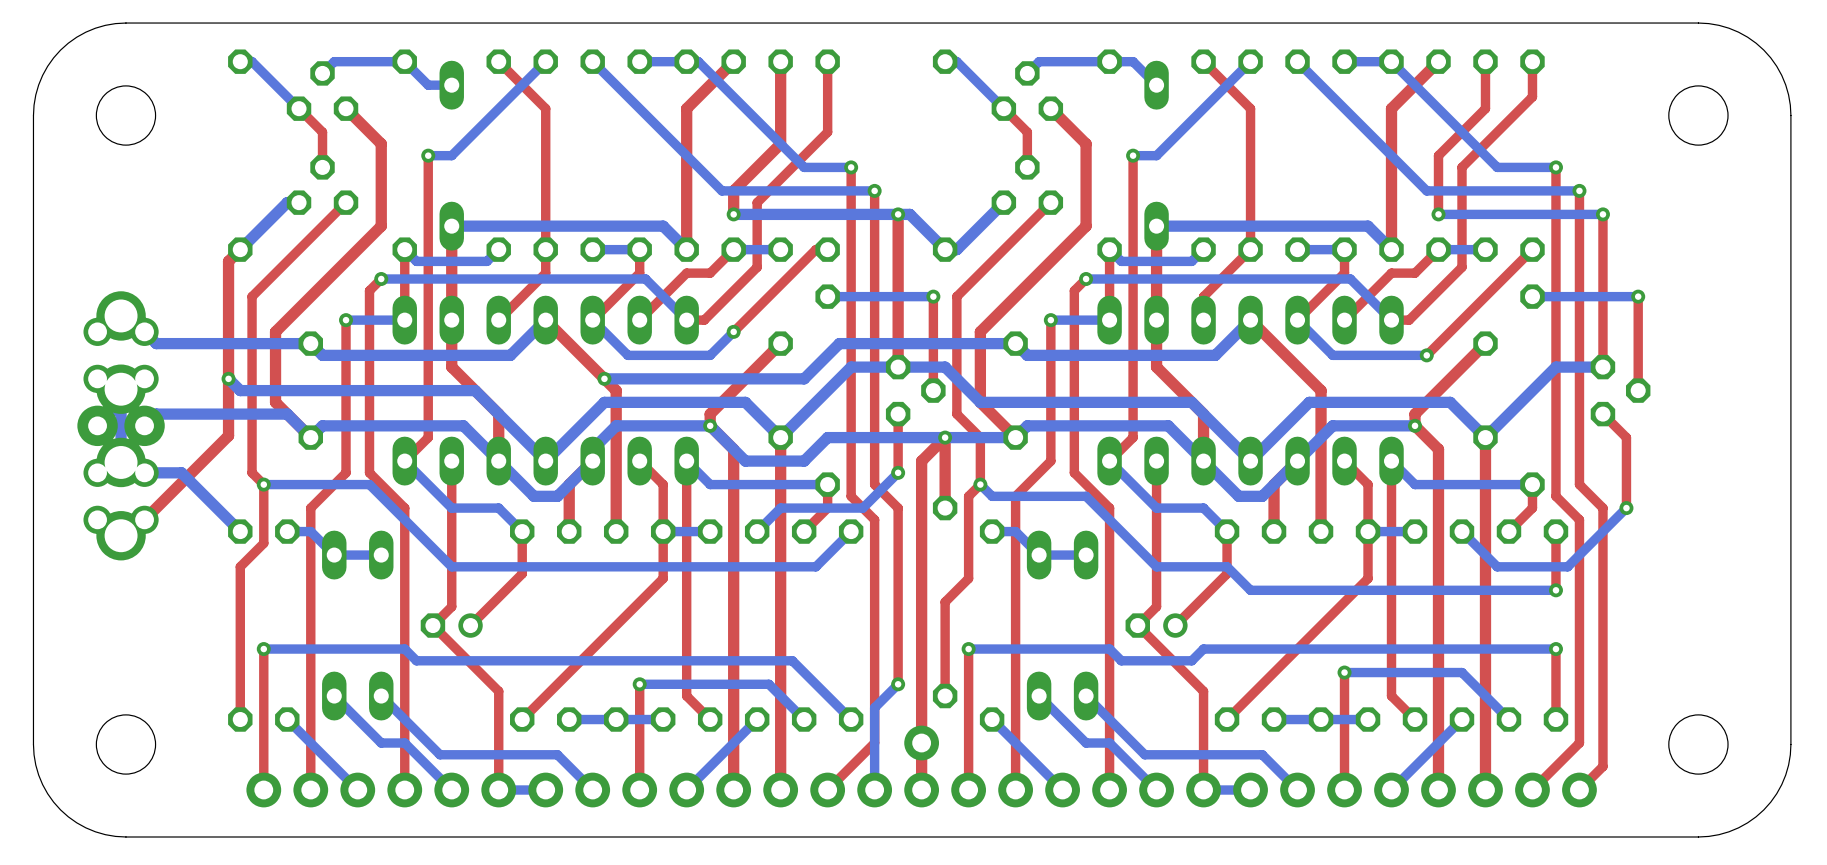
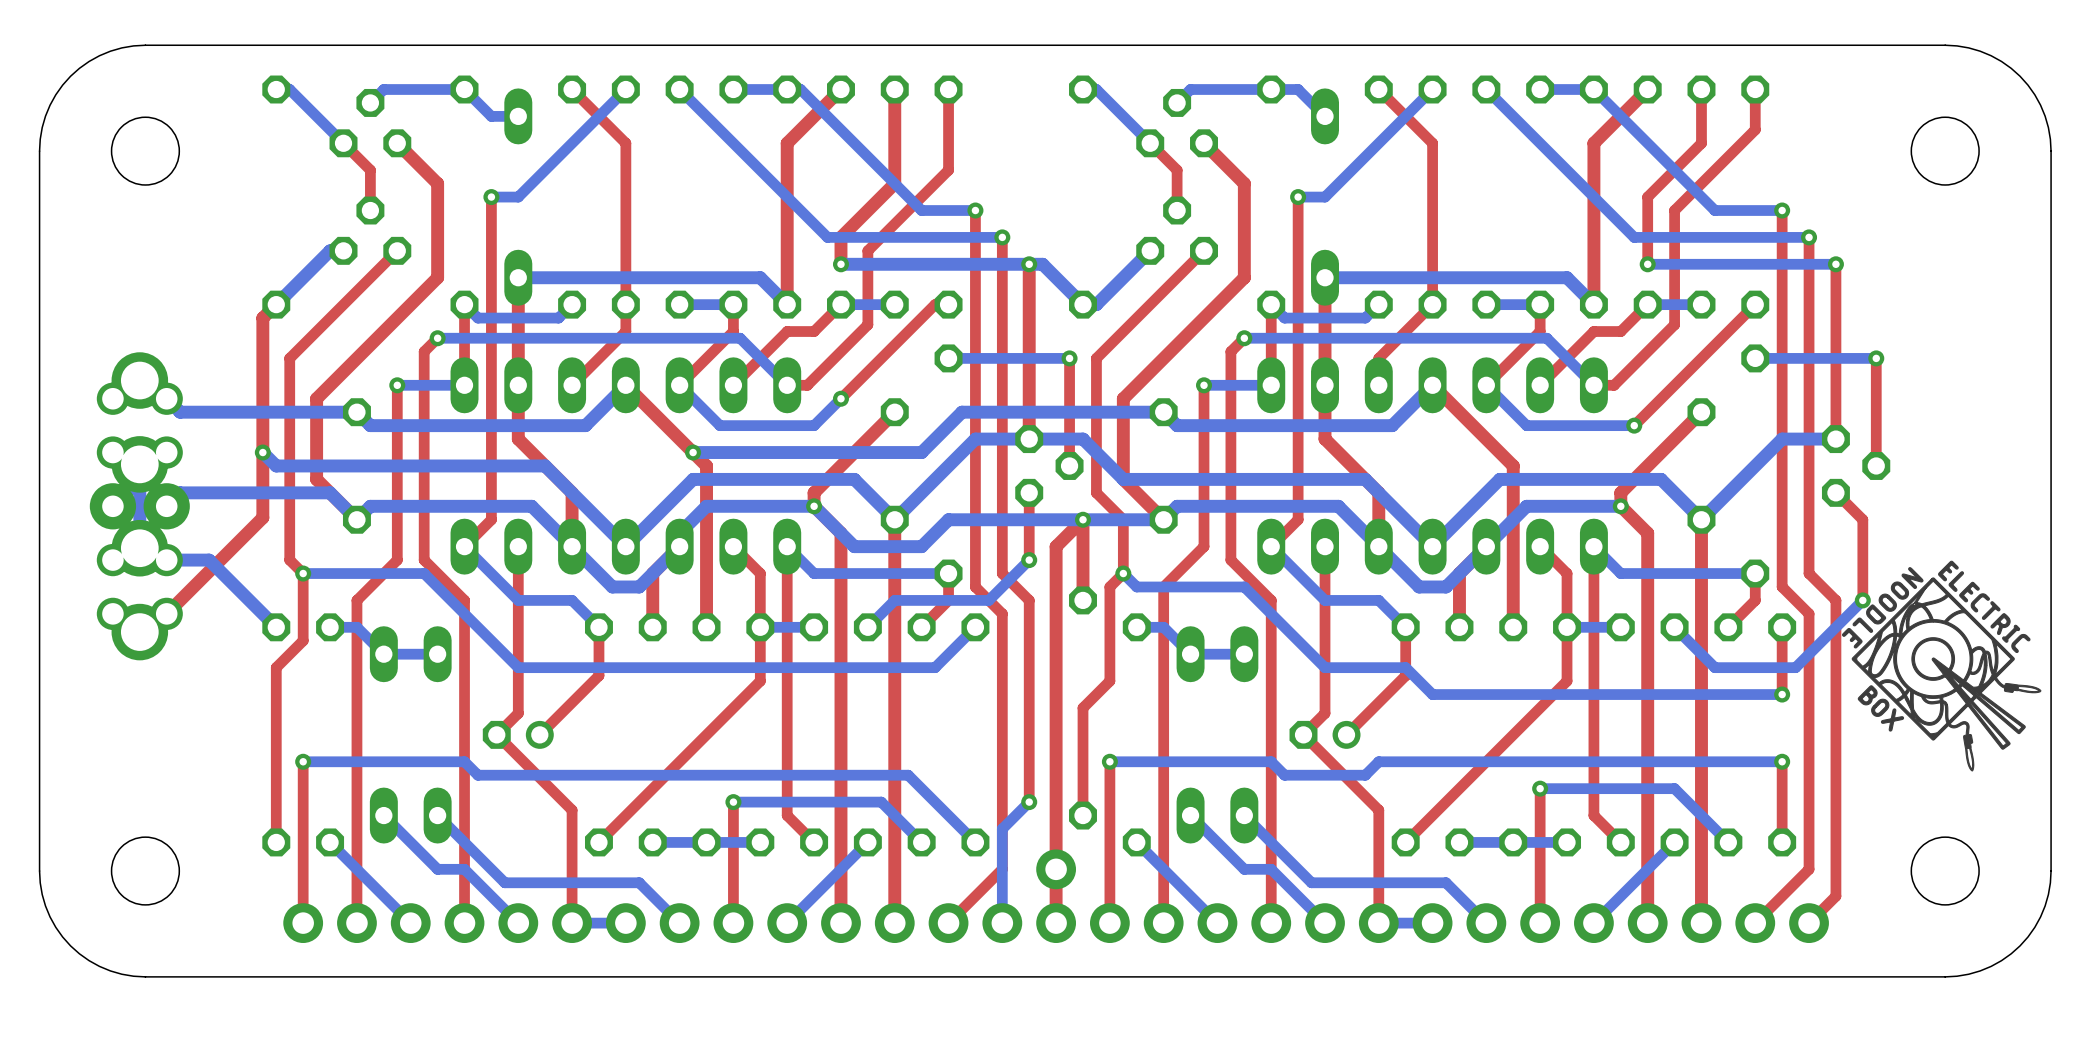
drawing: none -> [1842, 560, 2042, 772]

